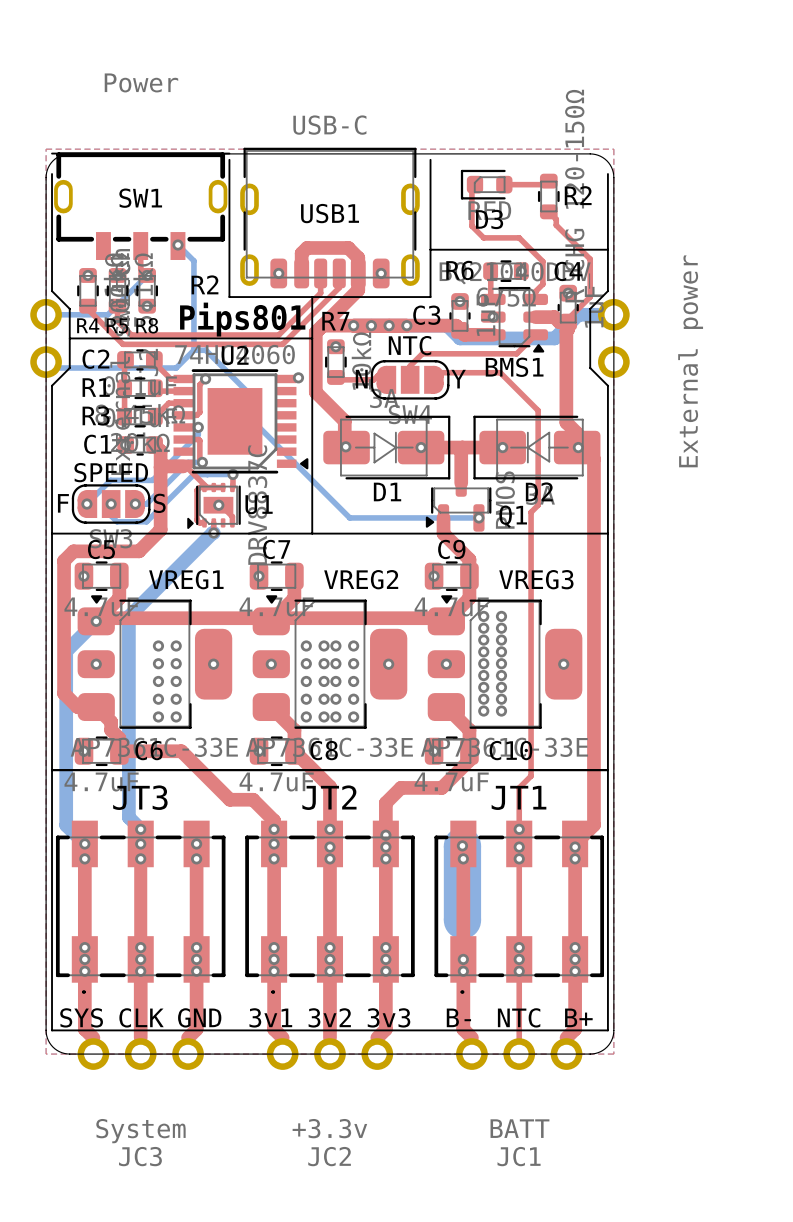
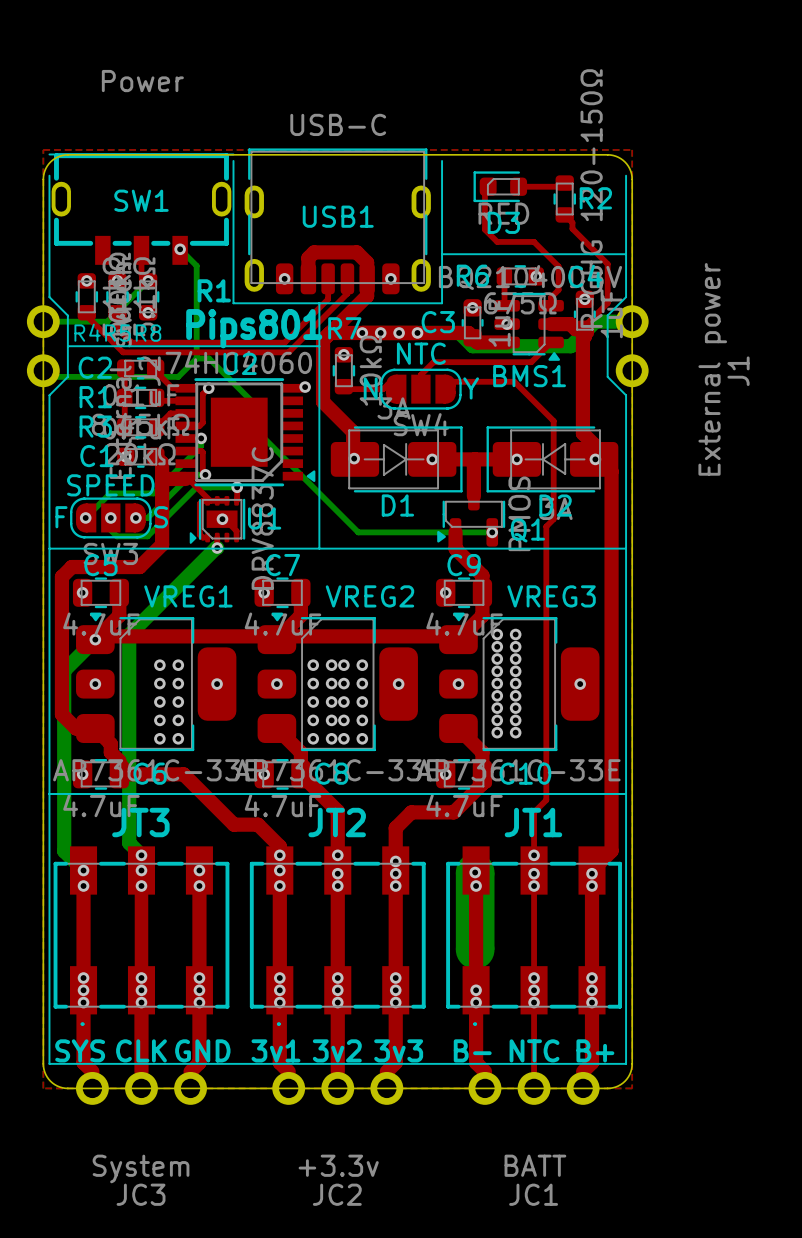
text: R2 (205, 284) -> R1 (214, 290)
J1 name: none -> J1 (738, 371)

